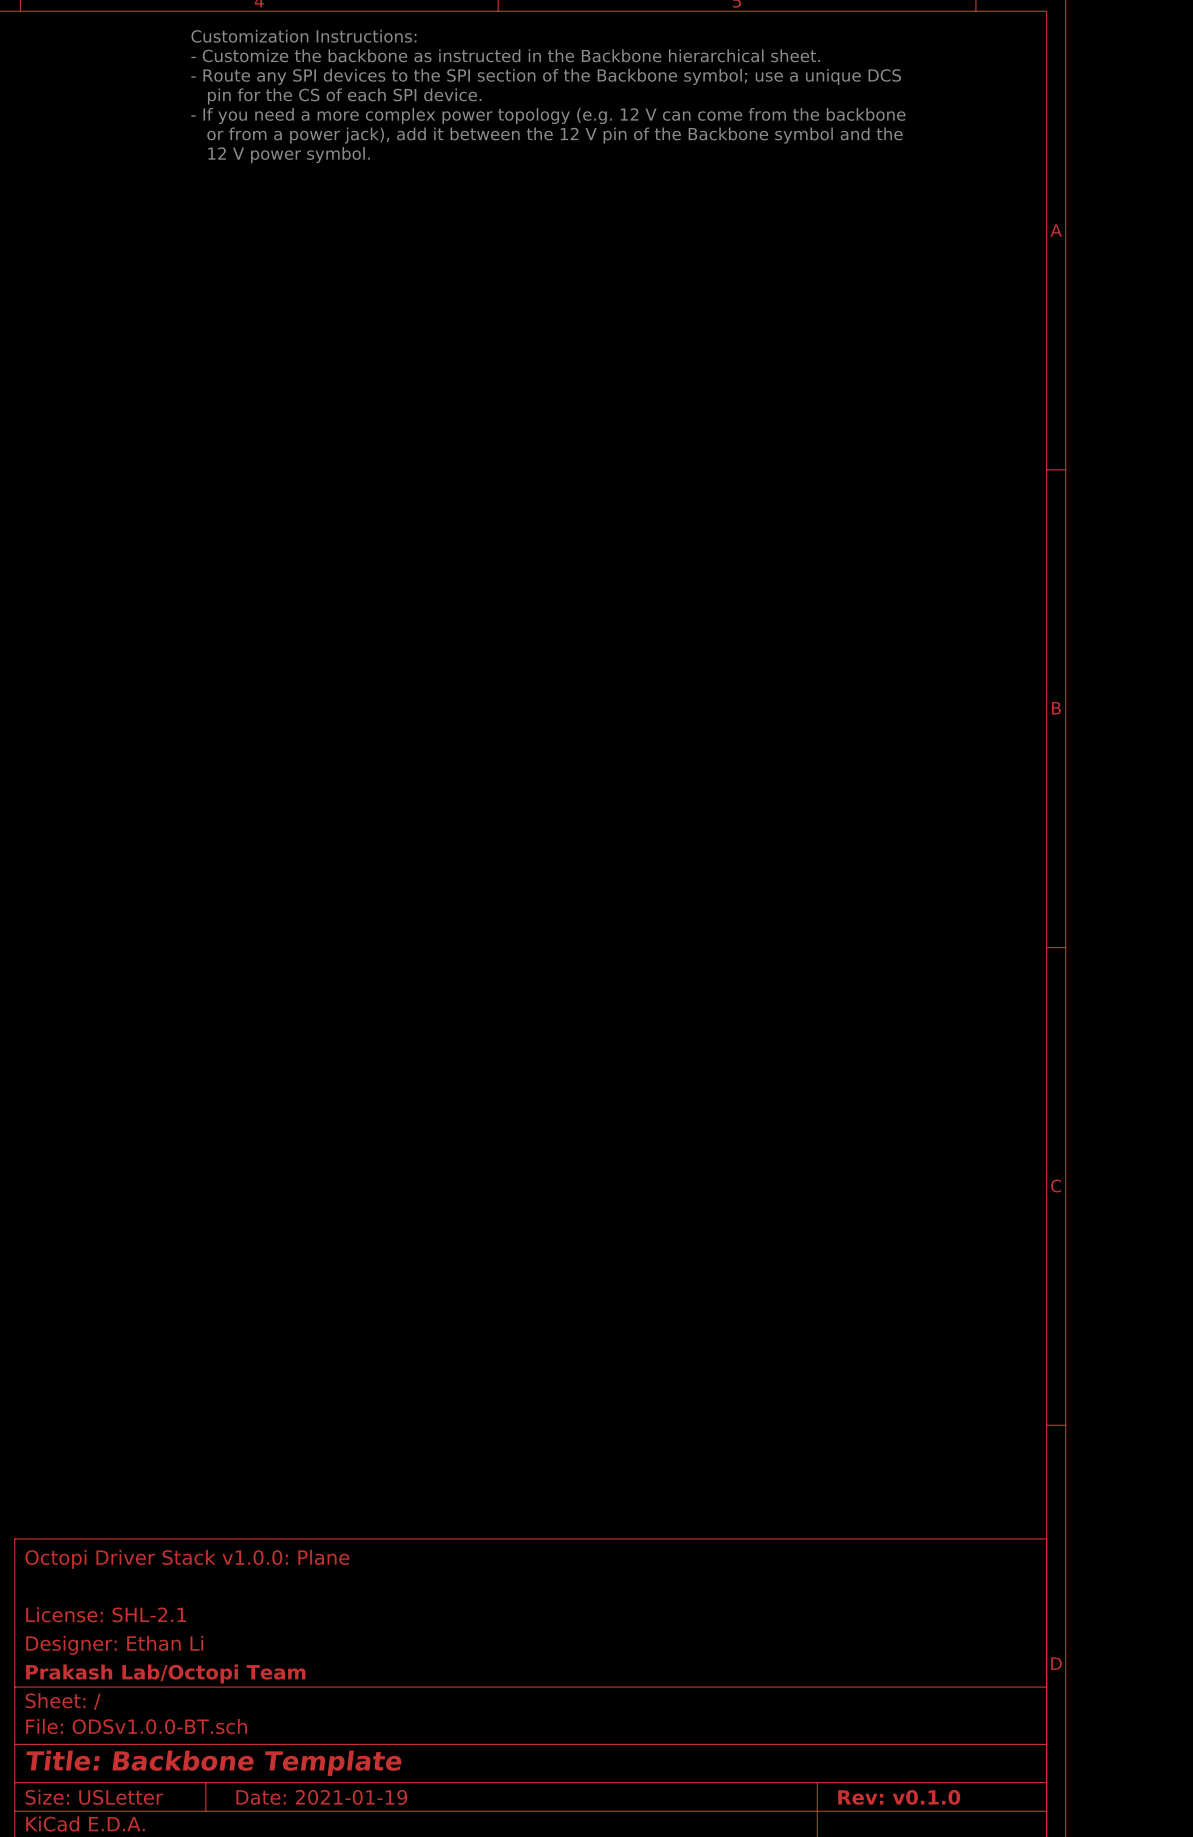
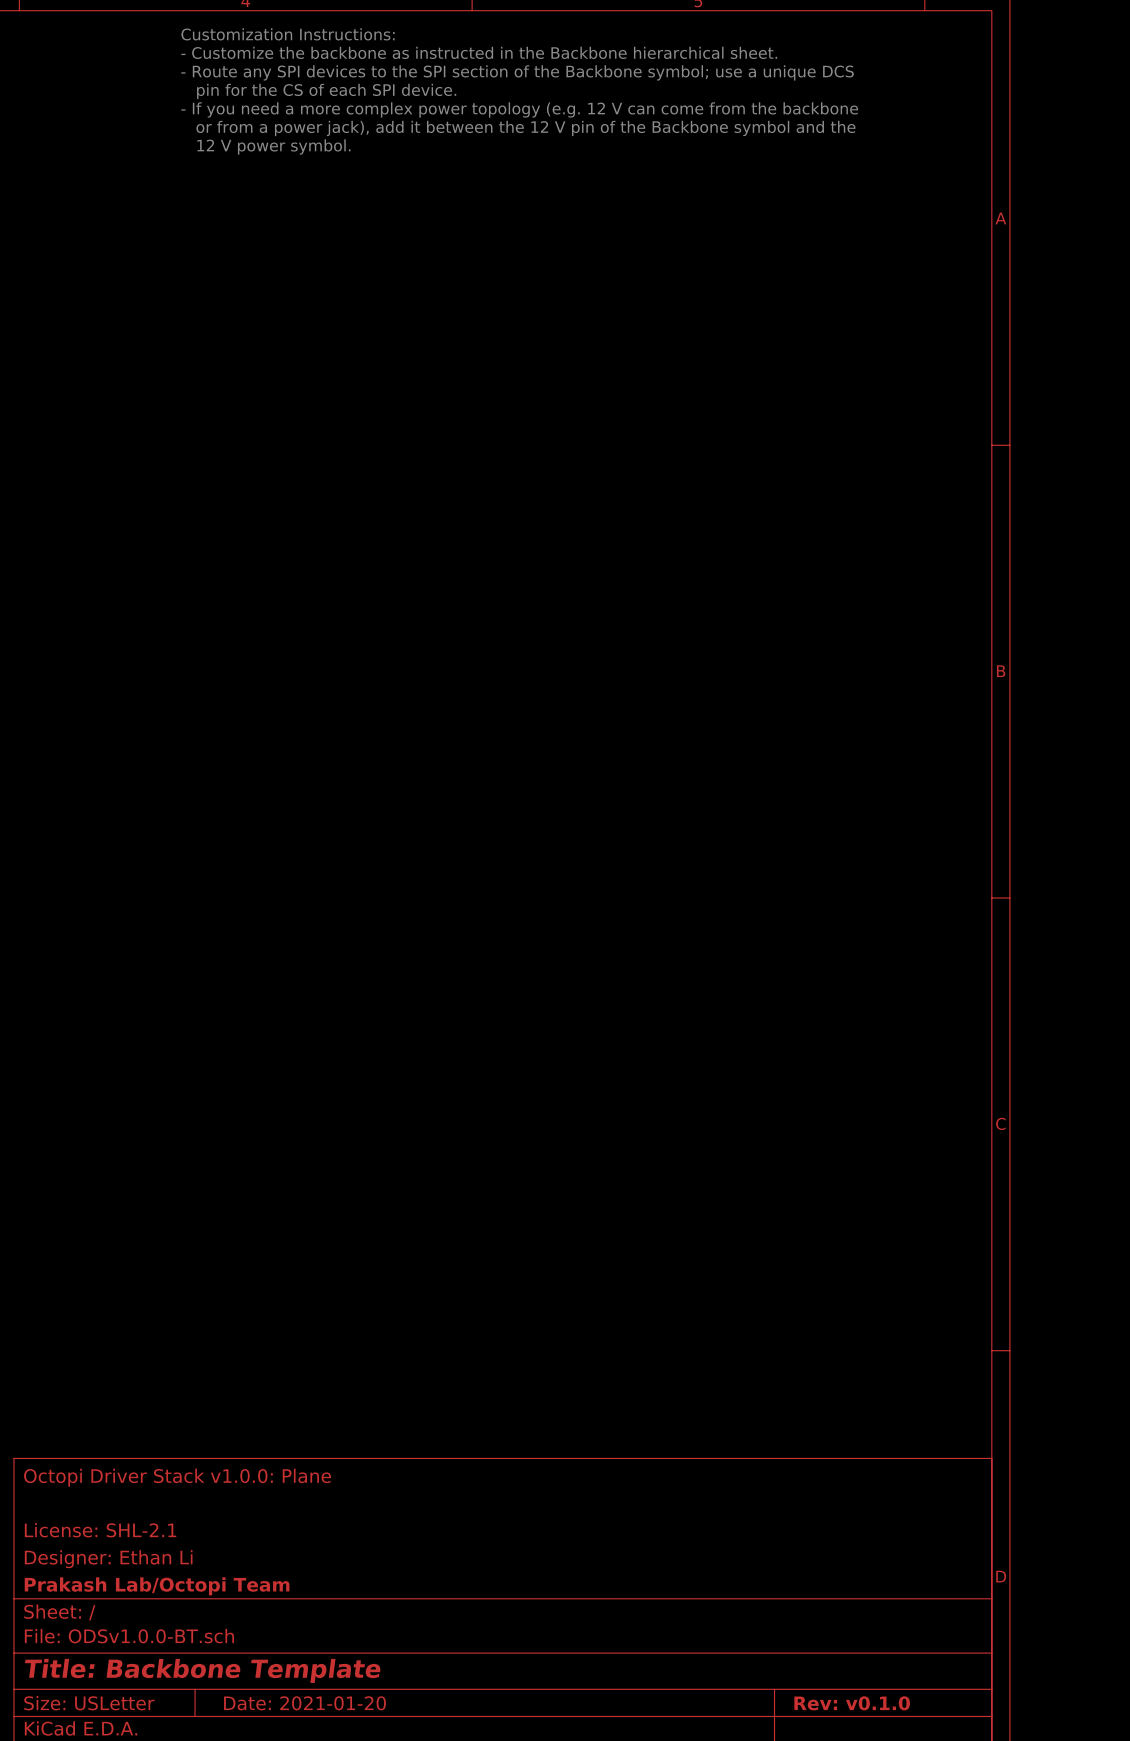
title block: Date: 2021-01-19 (321, 1797) -> Date: 2021-01-20 (305, 1703)

